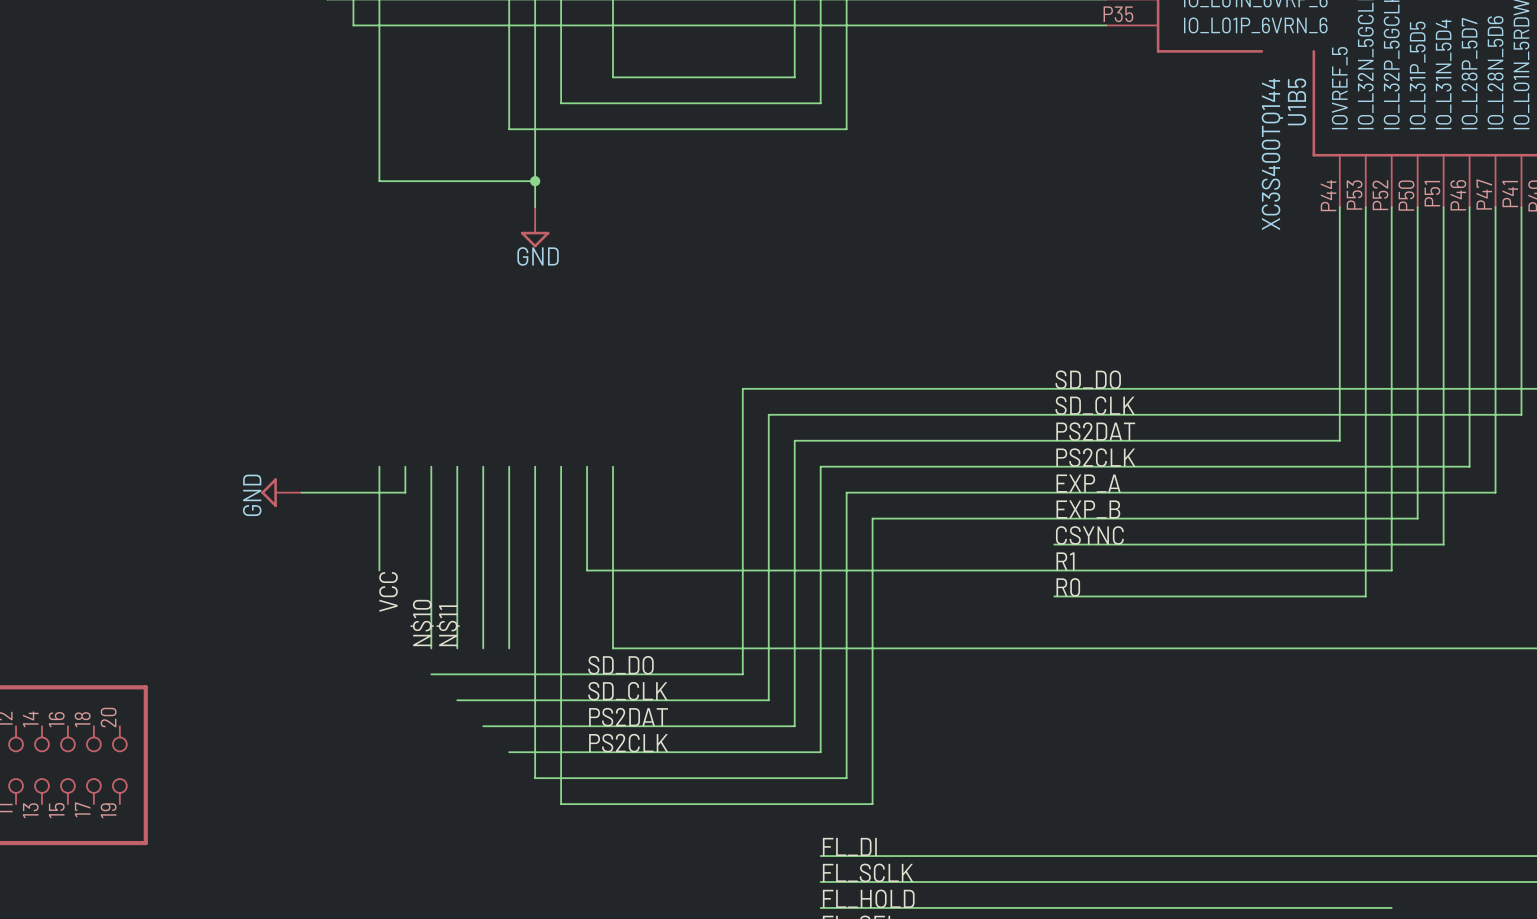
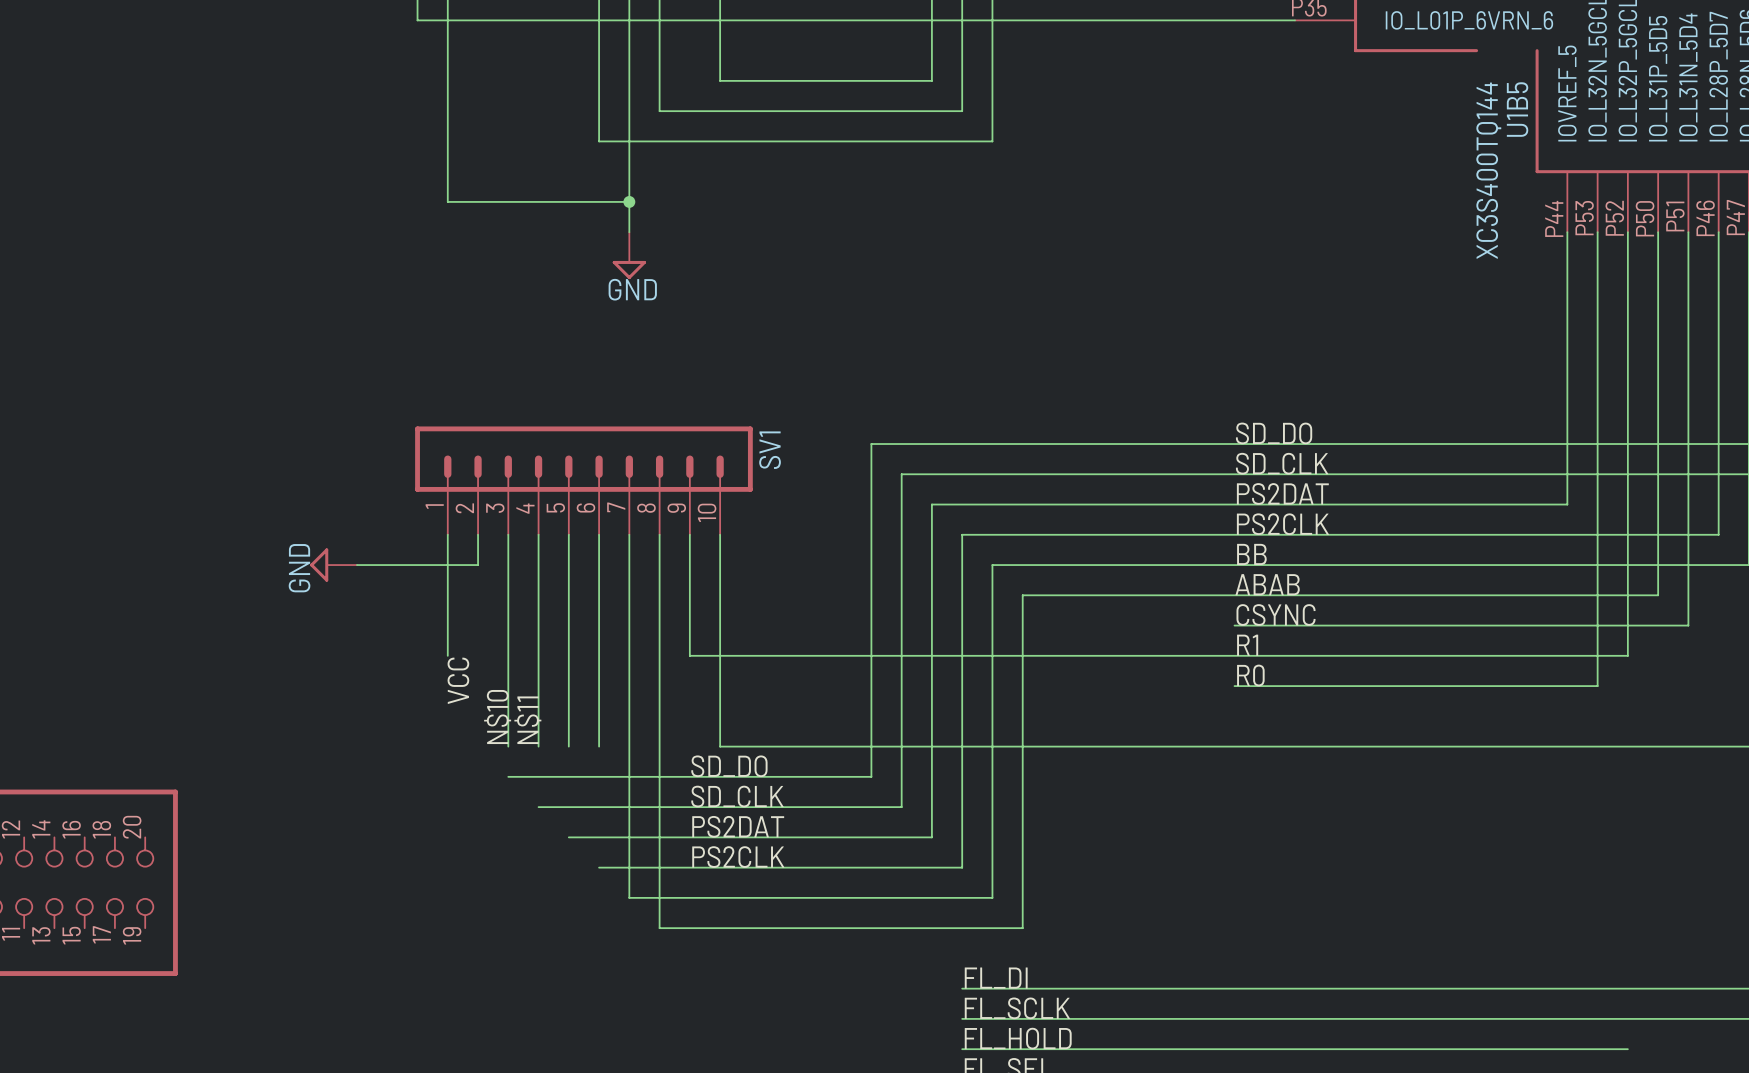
SV1: none -> (583, 480)
label: EXP_A (1088, 483) -> BB (1251, 554)
label: EXP_B (1088, 509) -> ABAB (1267, 584)

